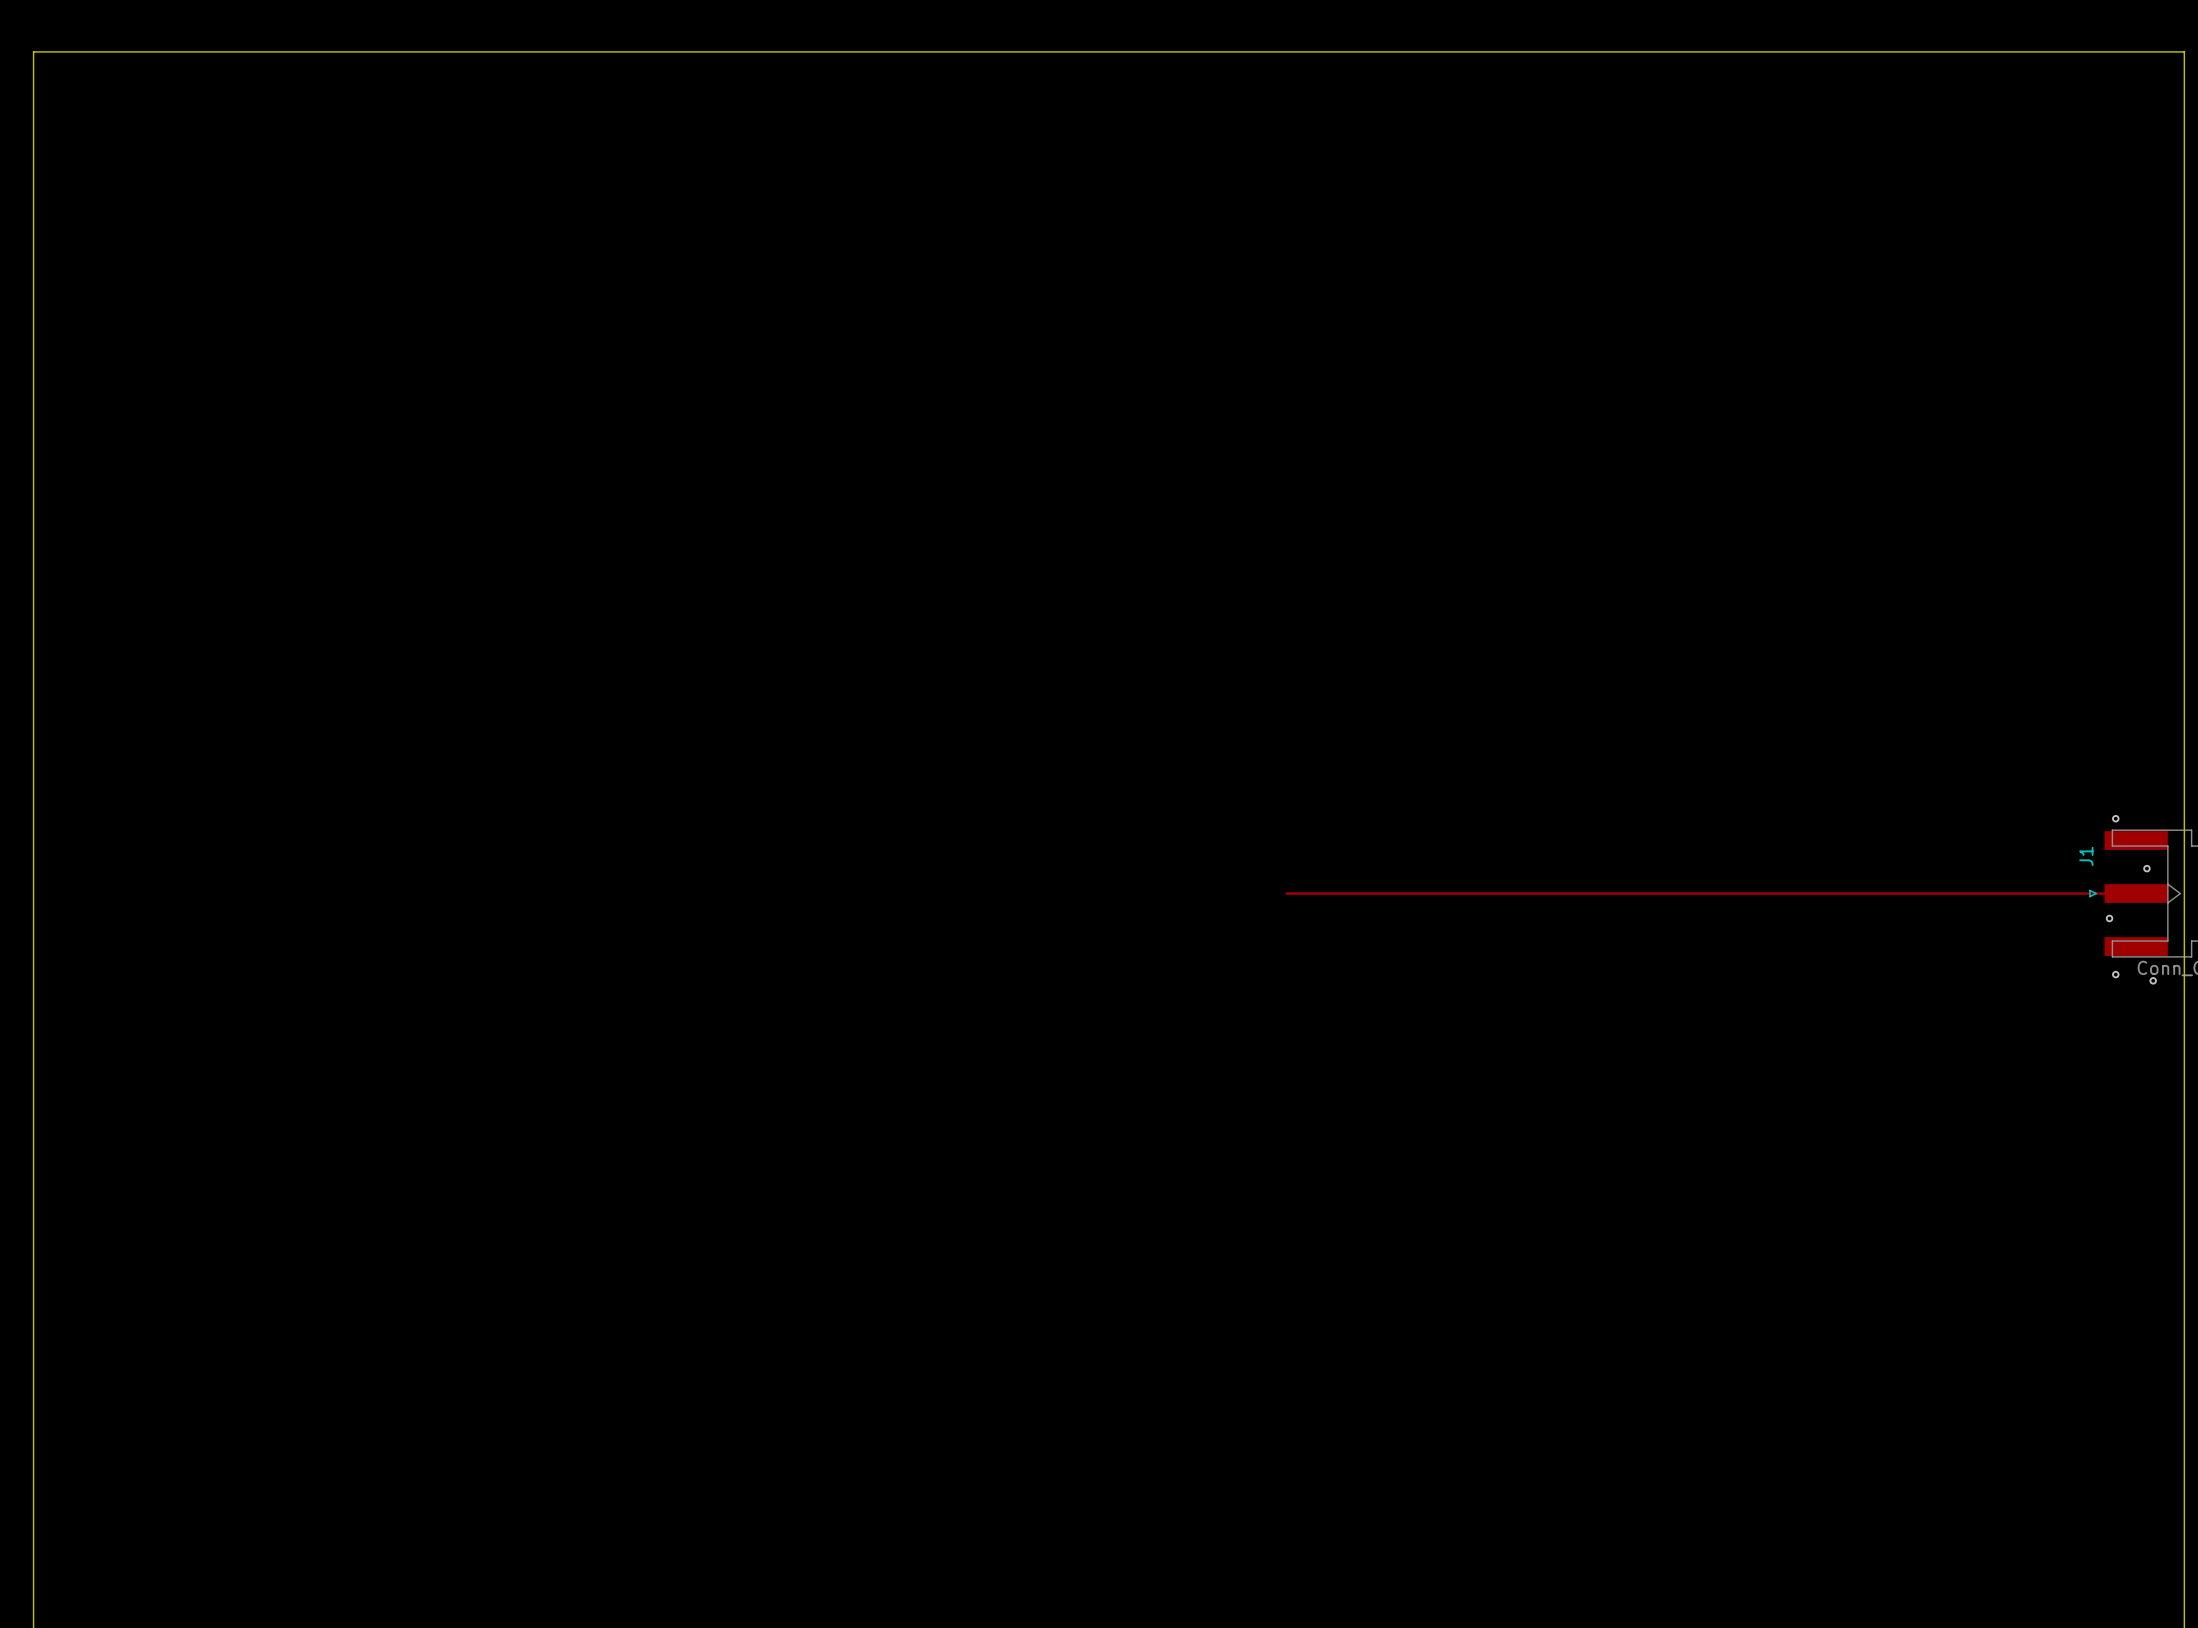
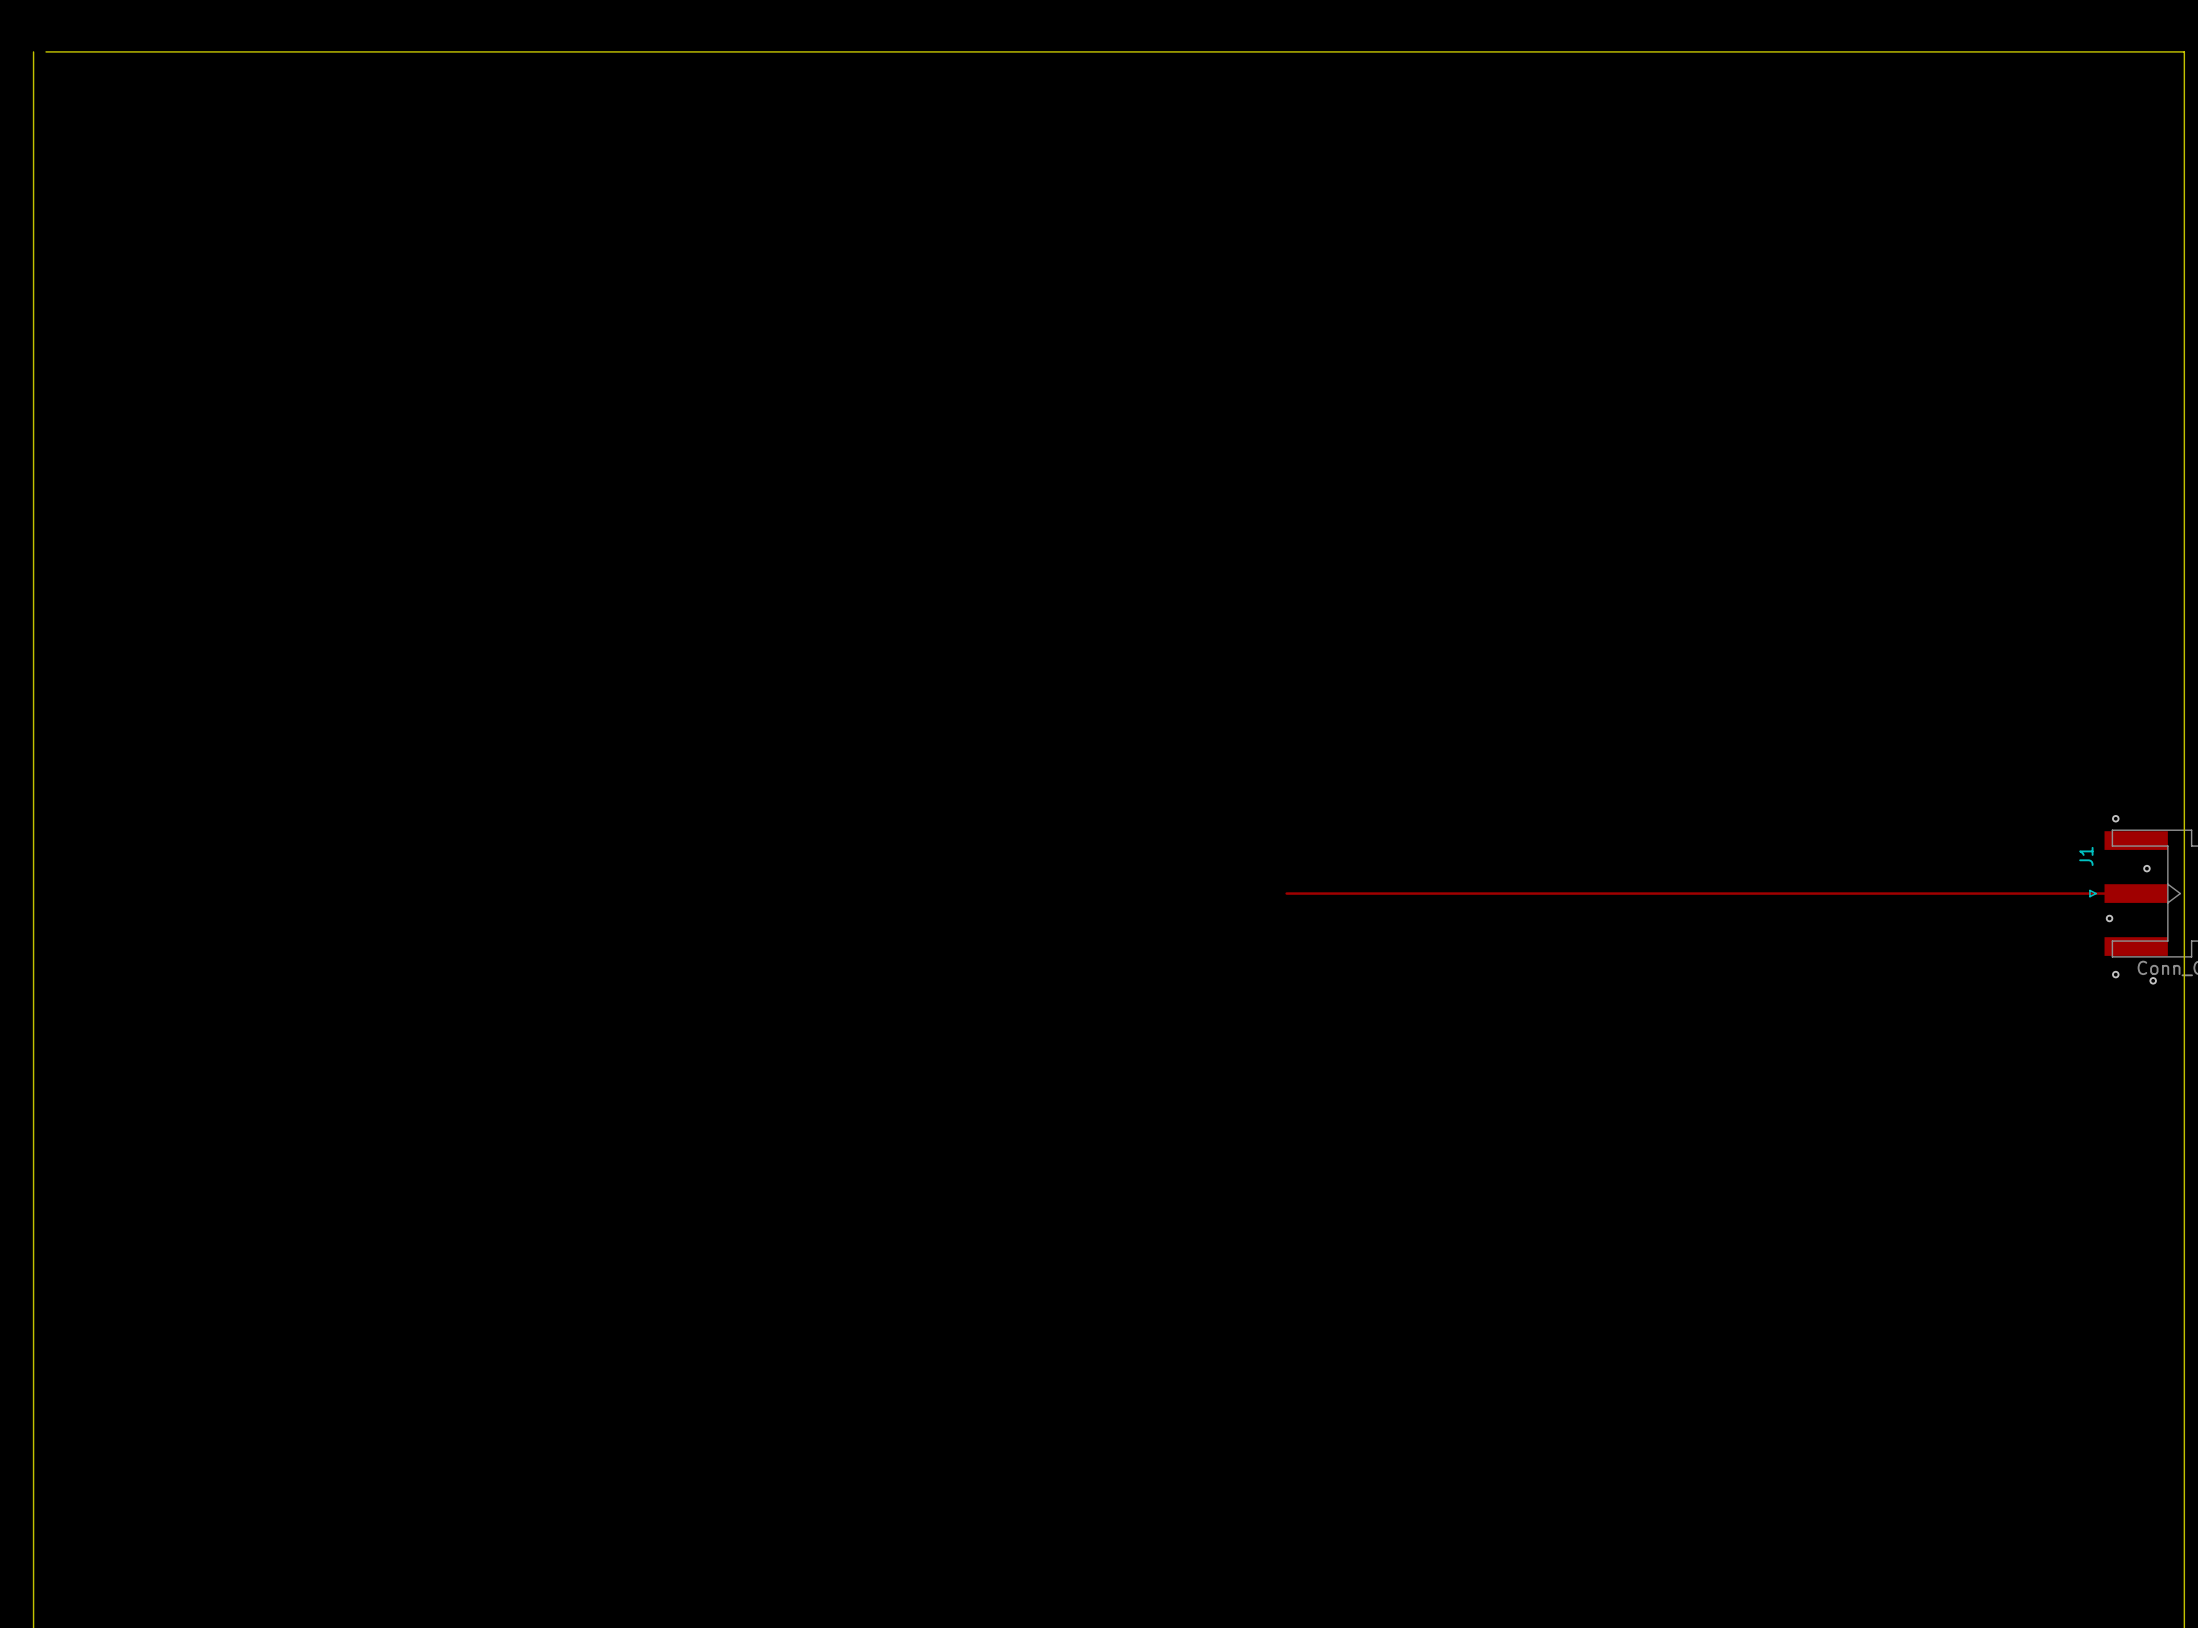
board edge: (33, 51) (46, 51) -> none

